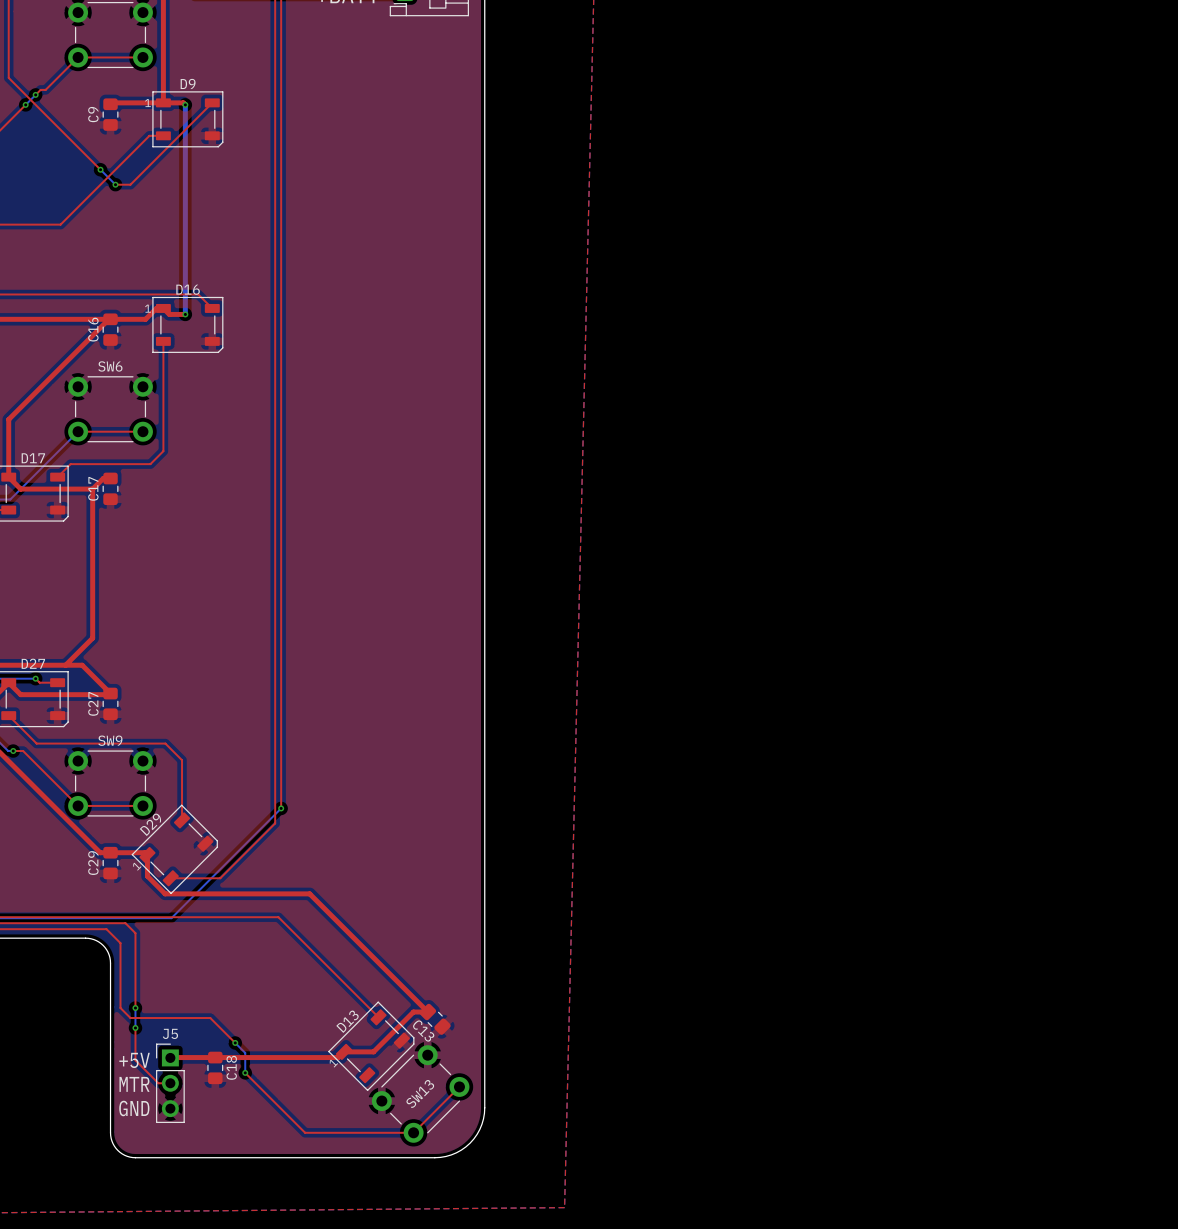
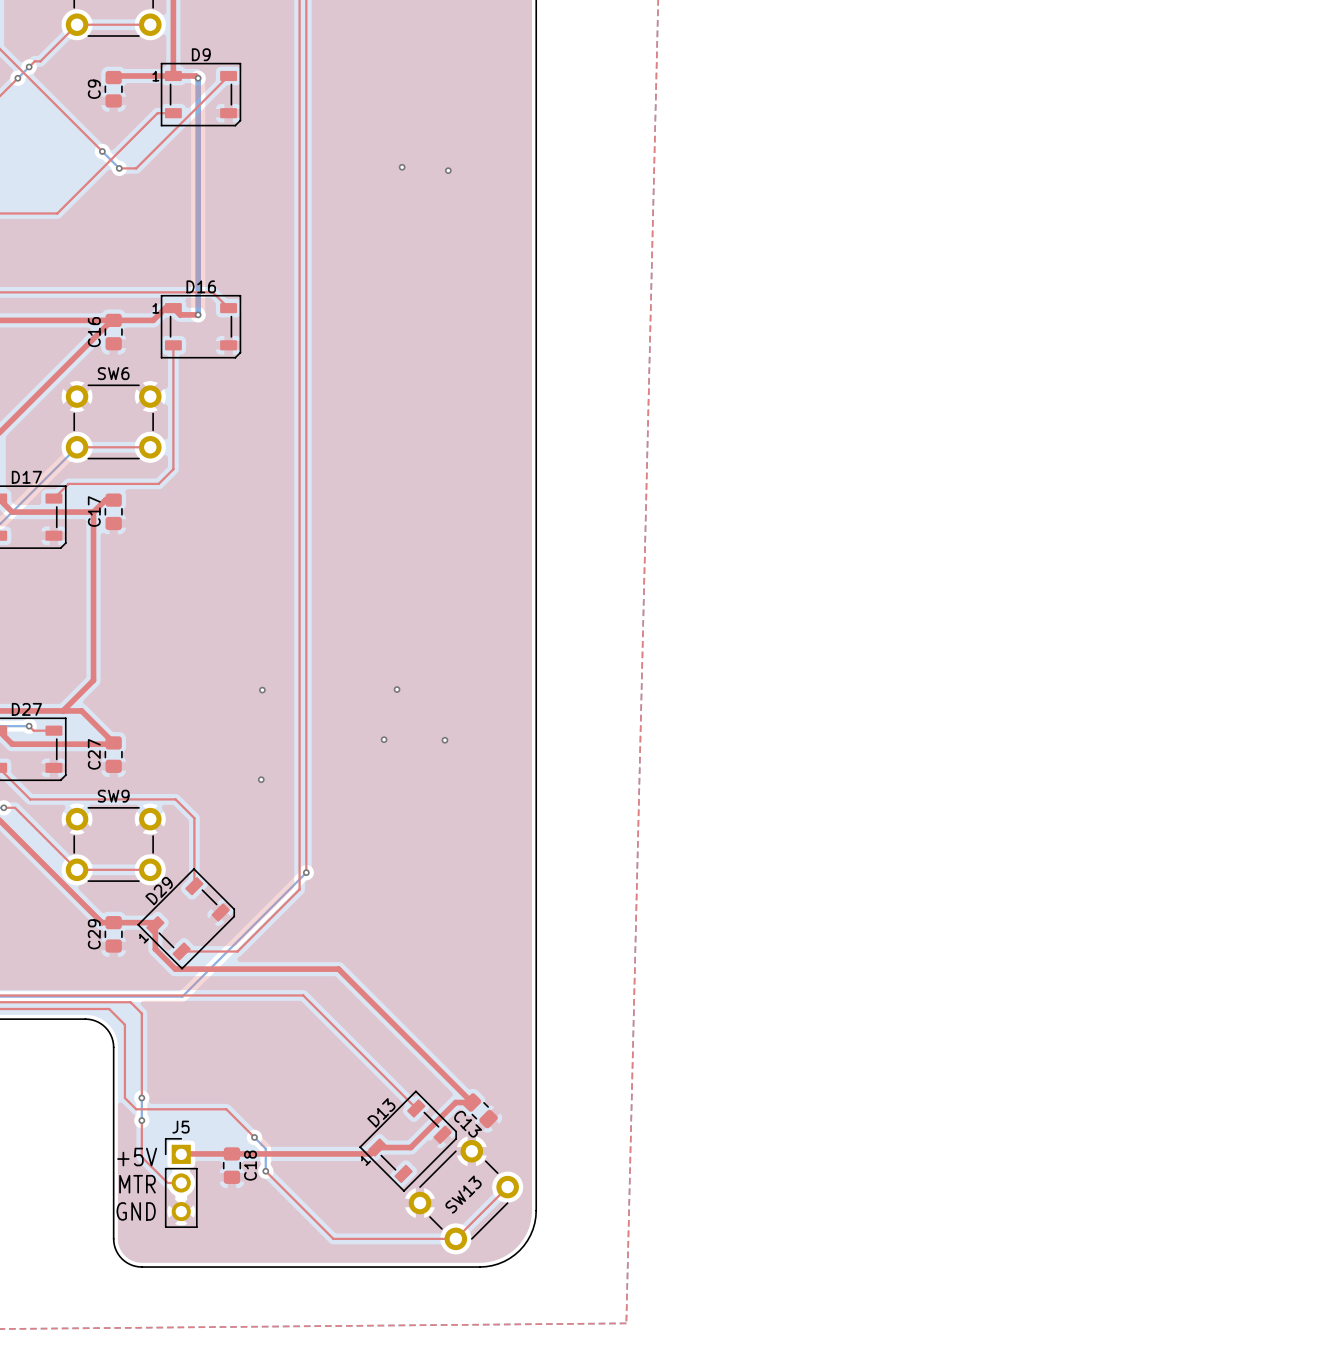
via: none -> (402, 167)
via: none -> (448, 170)
via: none -> (262, 690)
via: none -> (397, 689)
via: none -> (384, 739)
via: none -> (444, 740)
via: none -> (261, 779)

